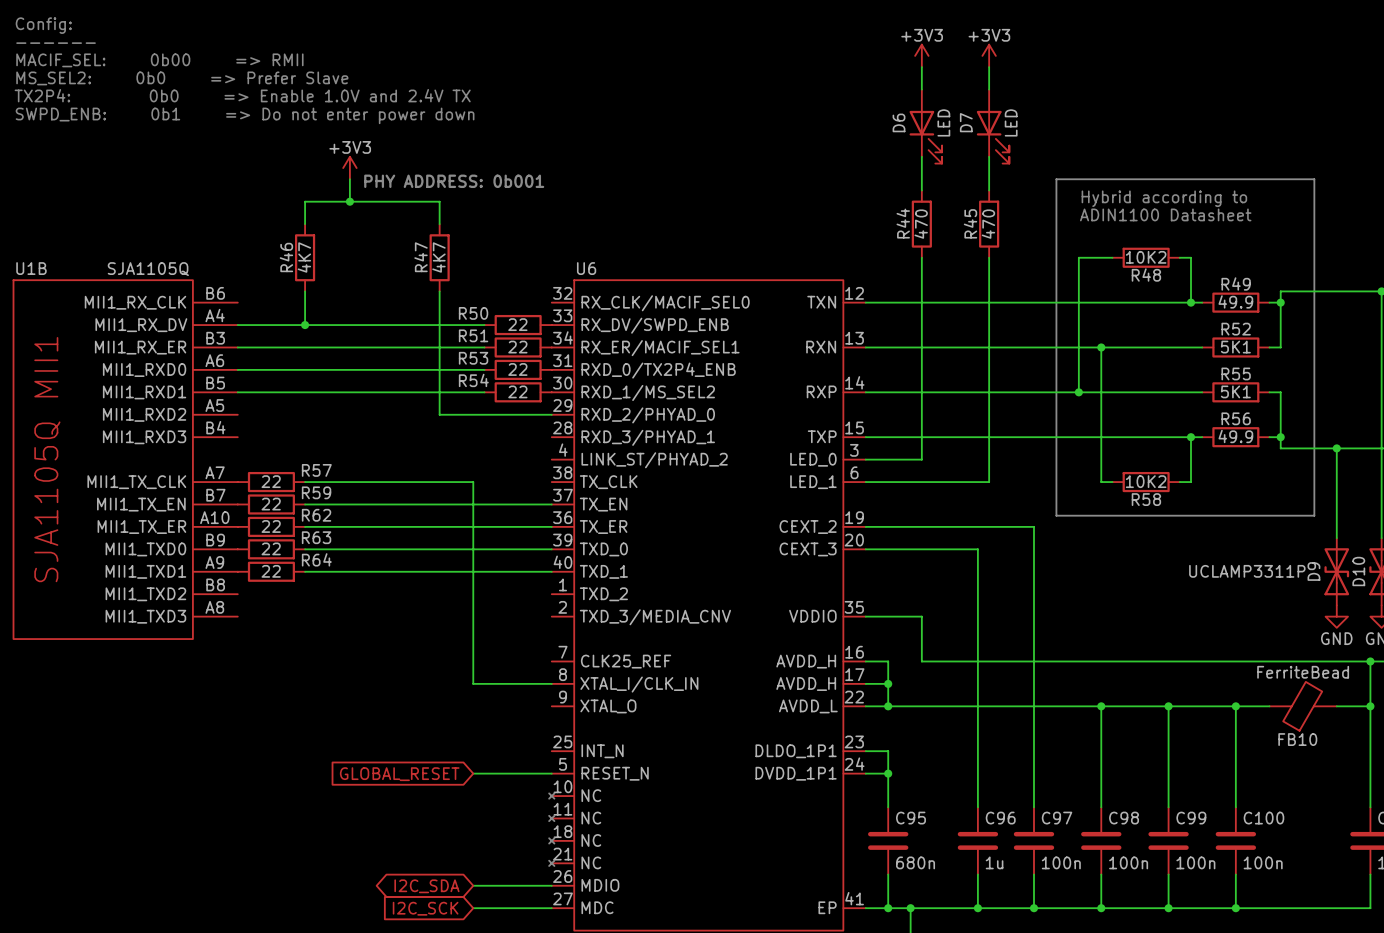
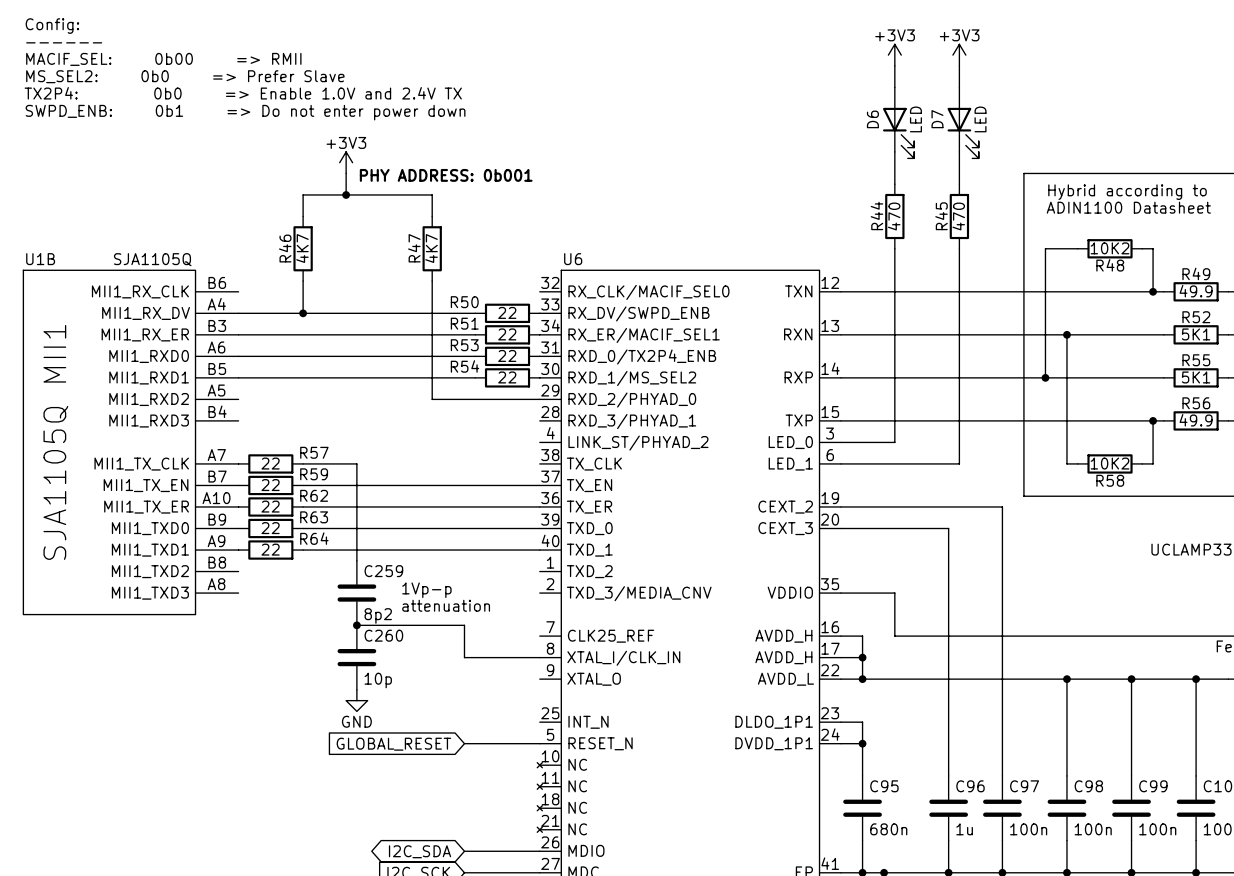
wire: (361, 482) (473, 482) (473, 650) -> (356, 463) (356, 560)
text: none -> 1Vp-p (426, 590)
C259: none -> 8p2 (356, 593)
text: none -> attenuation (446, 605)
wire: none -> (356, 625) (464, 625)
junction: none -> (356, 625)
C260: none -> 10p (356, 657)
power symbol: none -> GND (356, 700)

